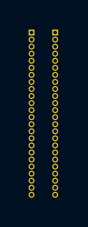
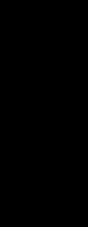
part: (31, 113) -> none
part: (55, 113) -> none

